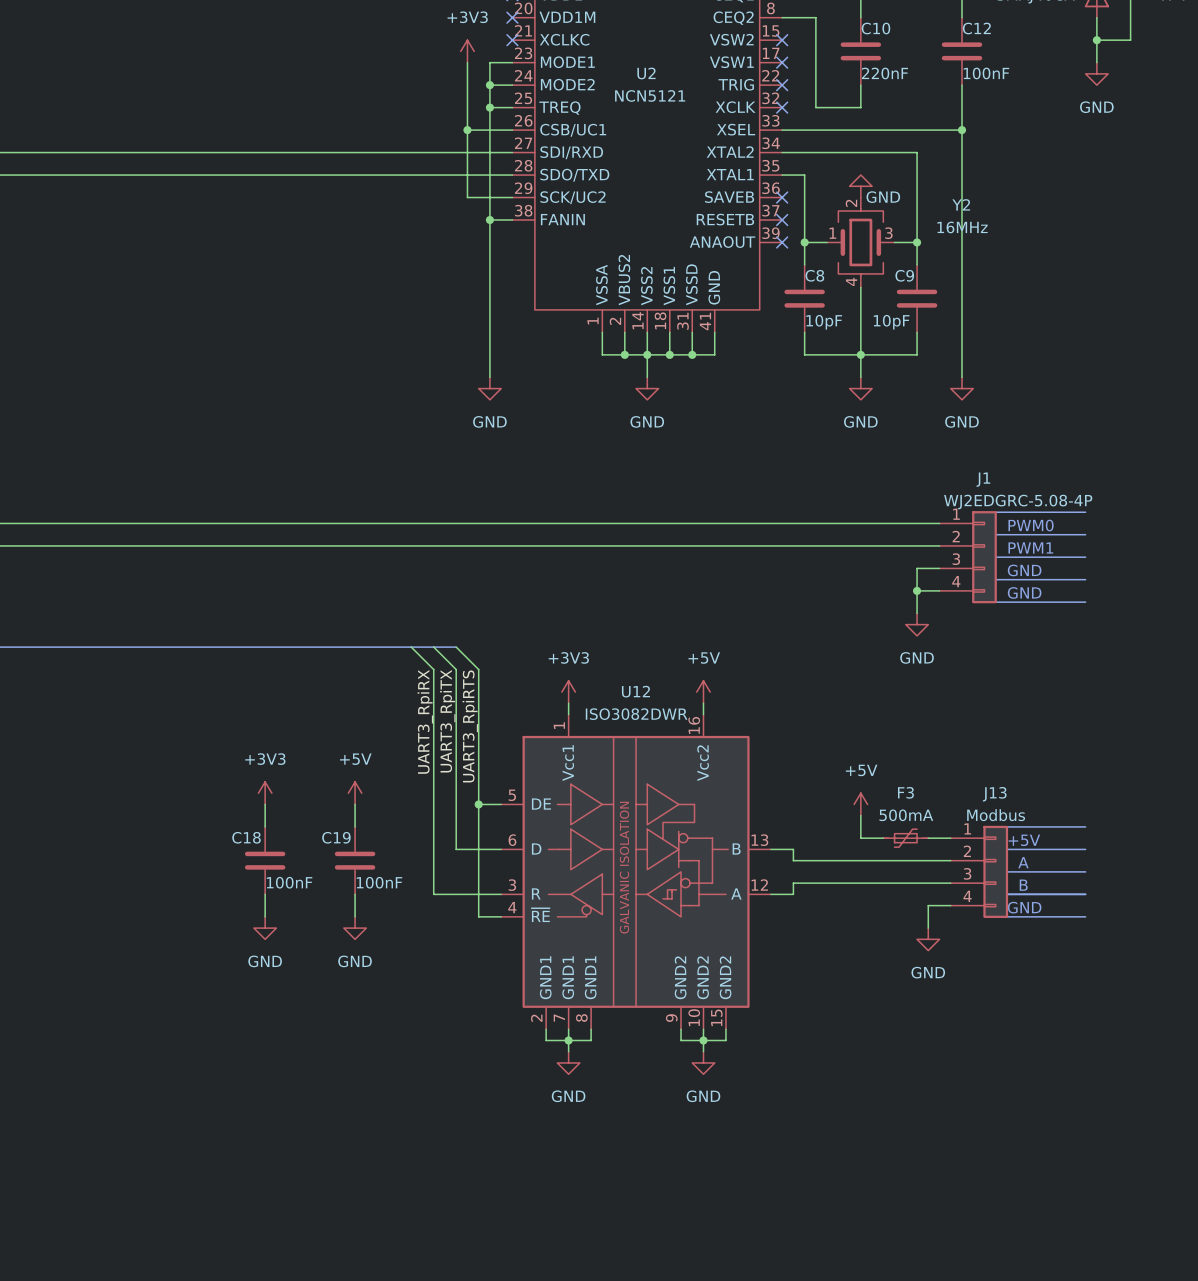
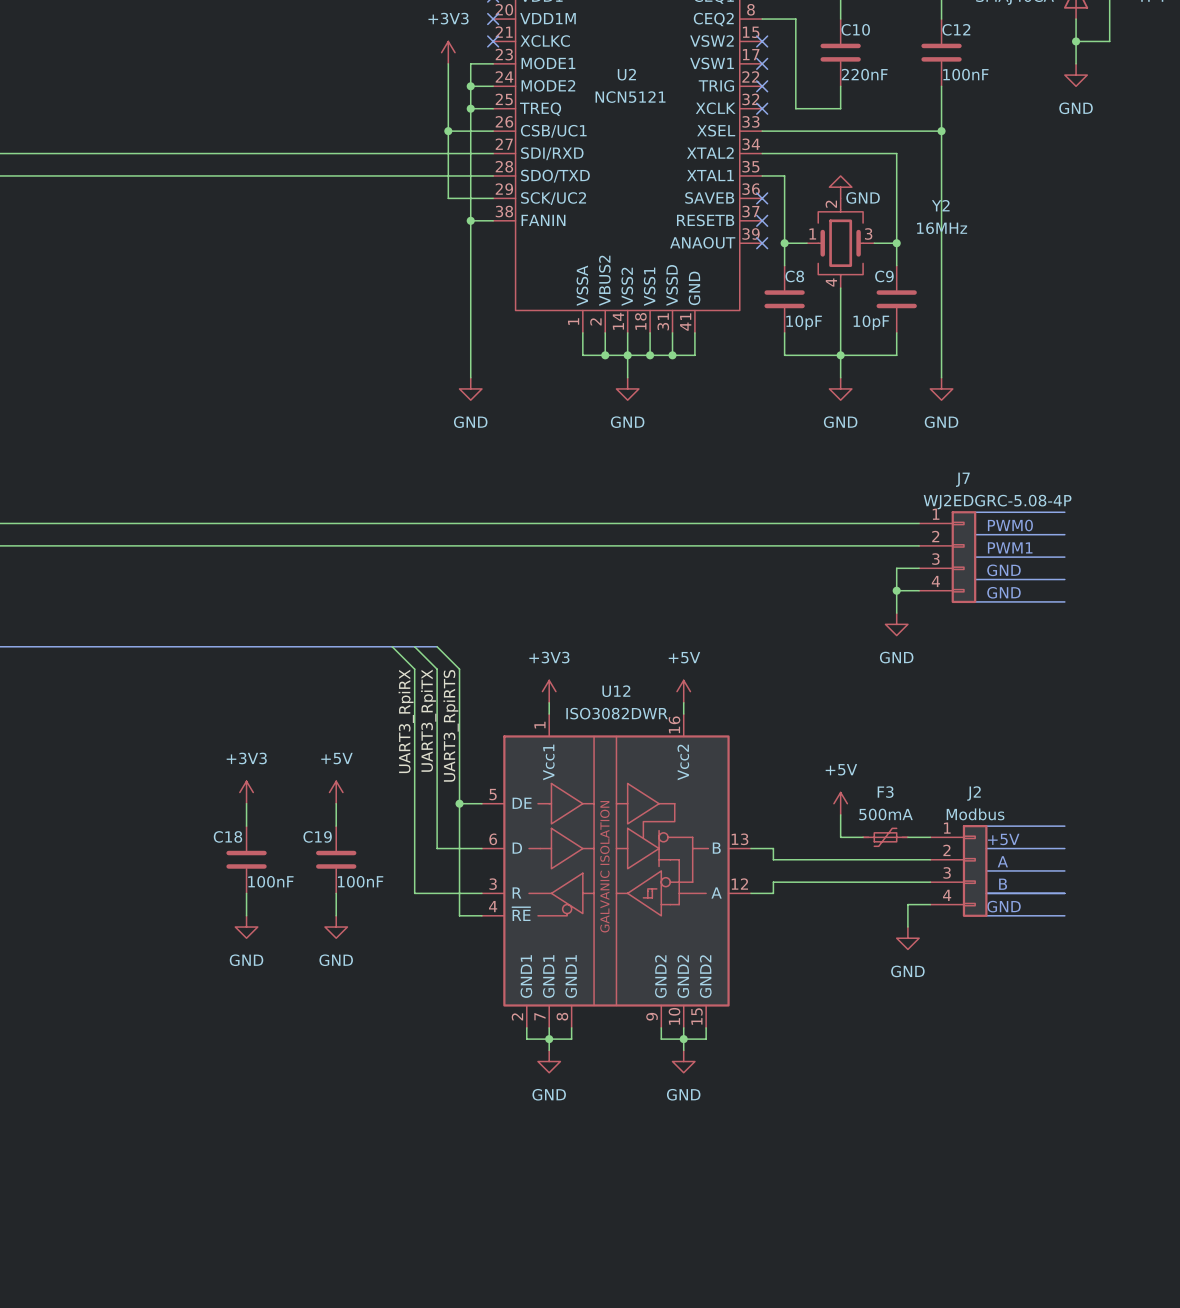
J1 name: J1 (983, 479) -> J7 (962, 479)
J13 name: J13 (994, 794) -> J2 (974, 793)

